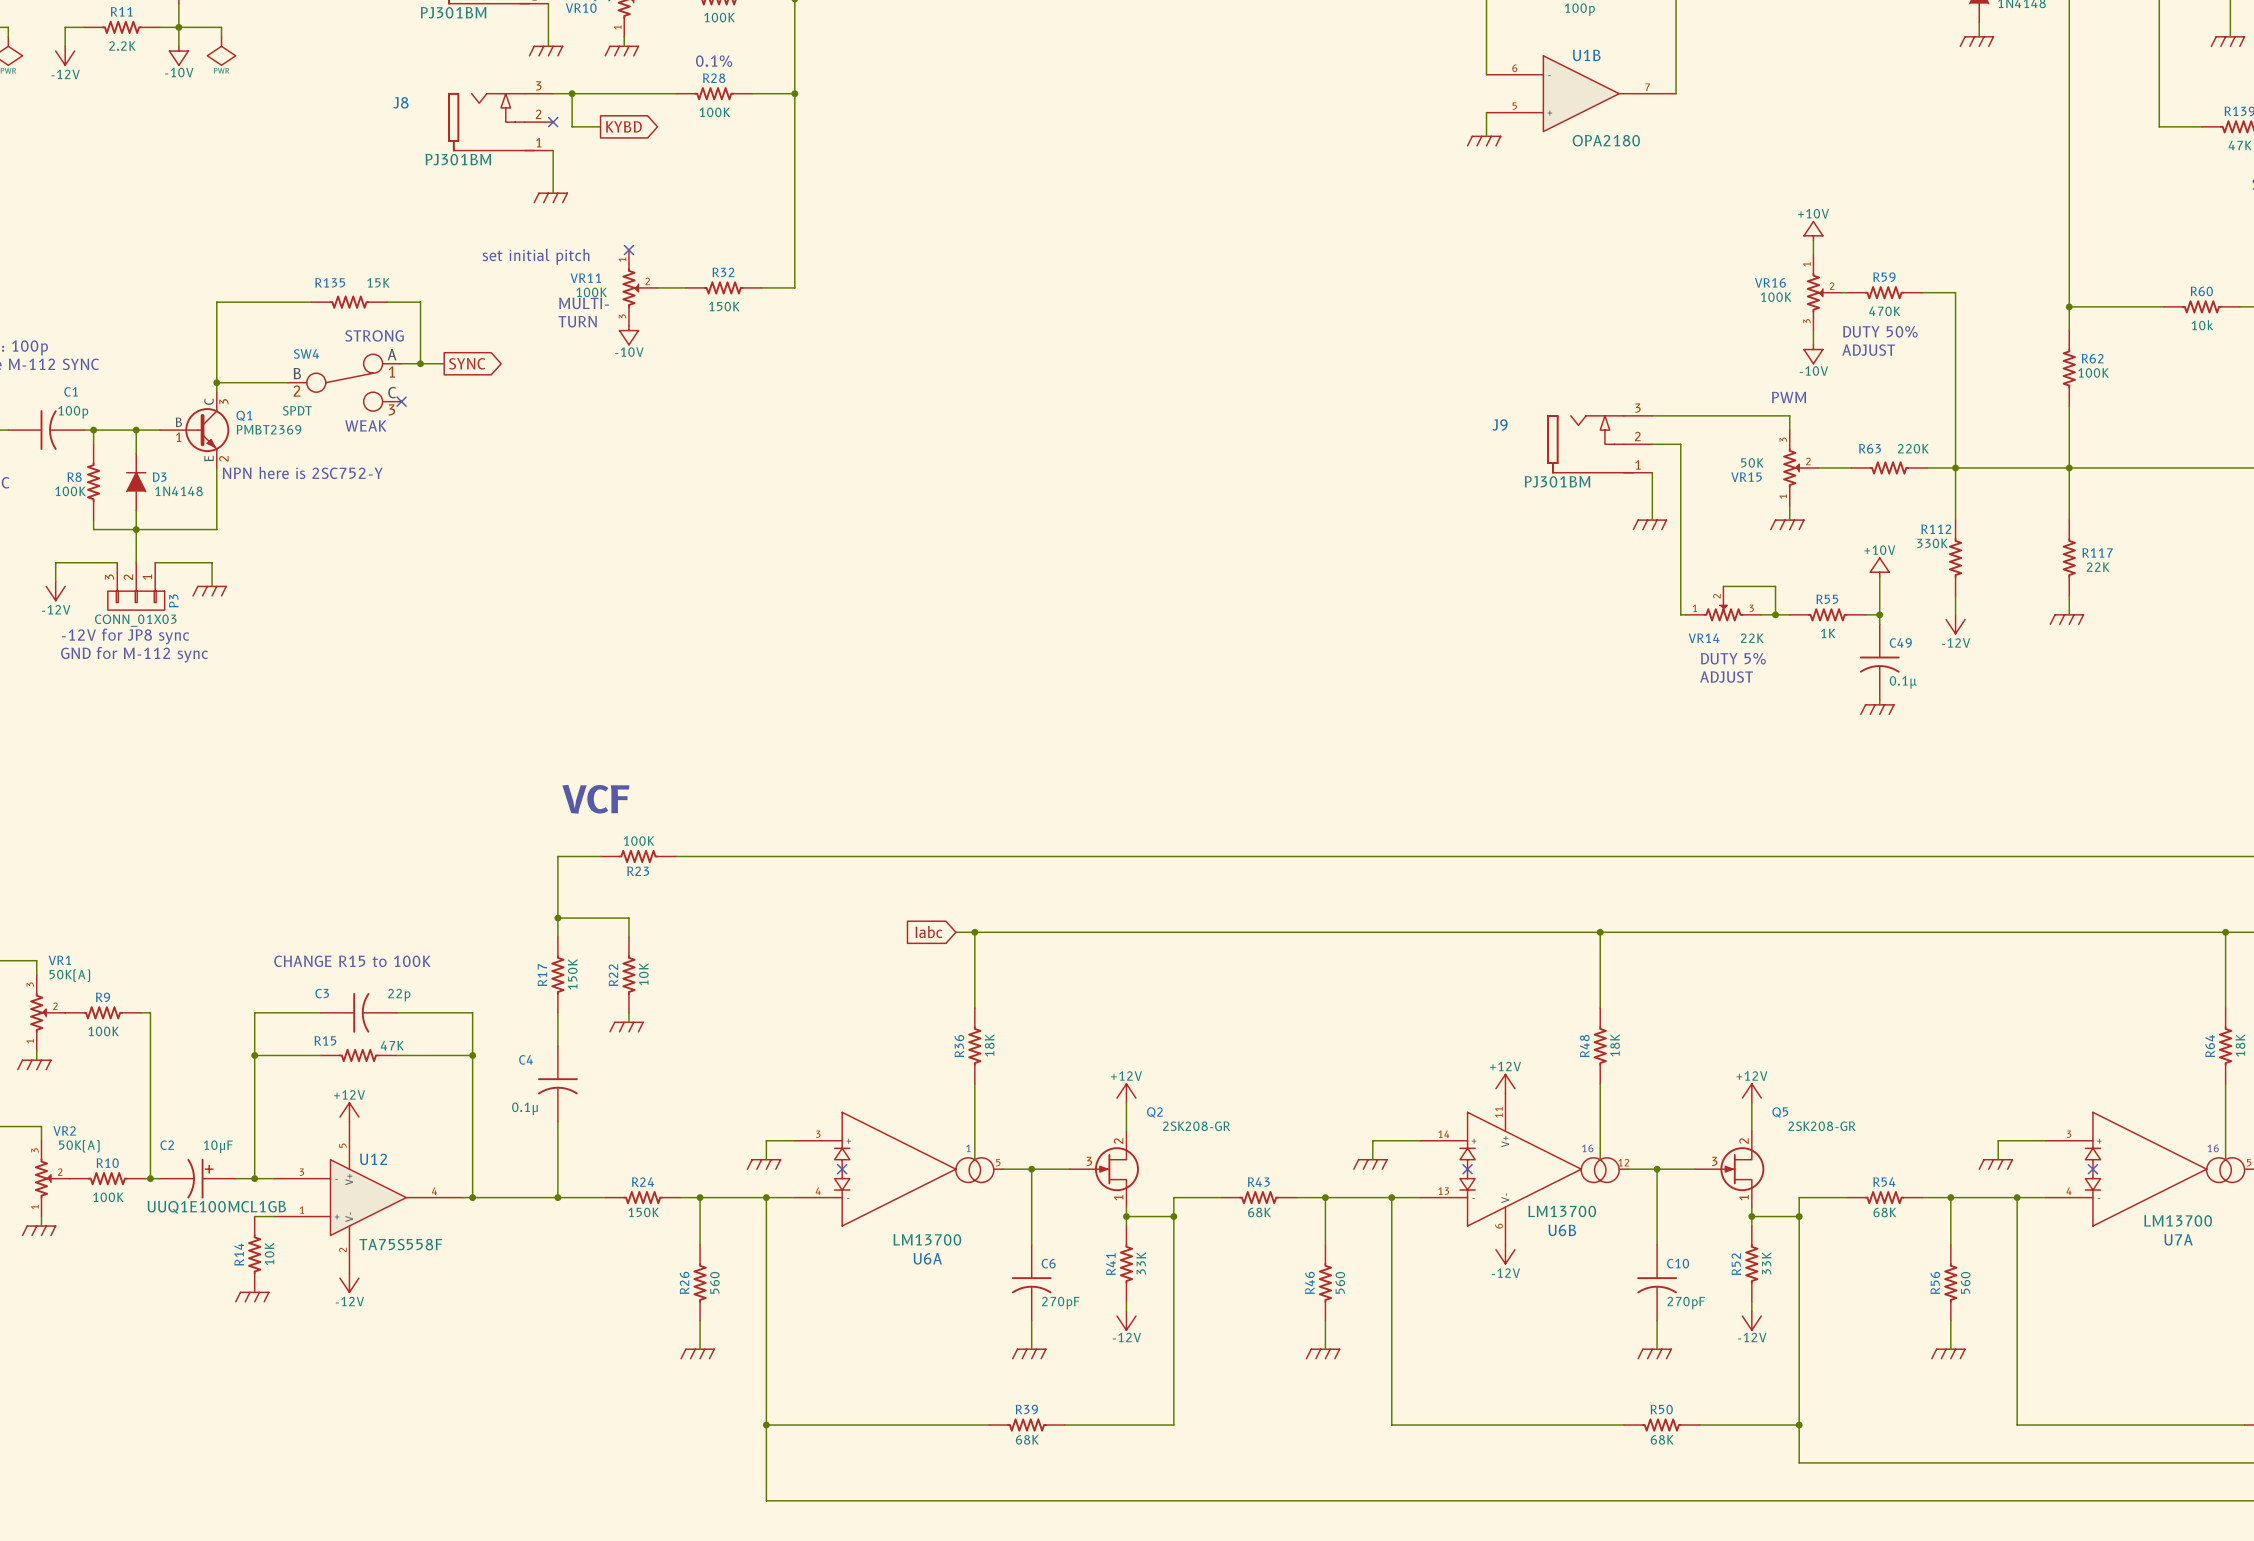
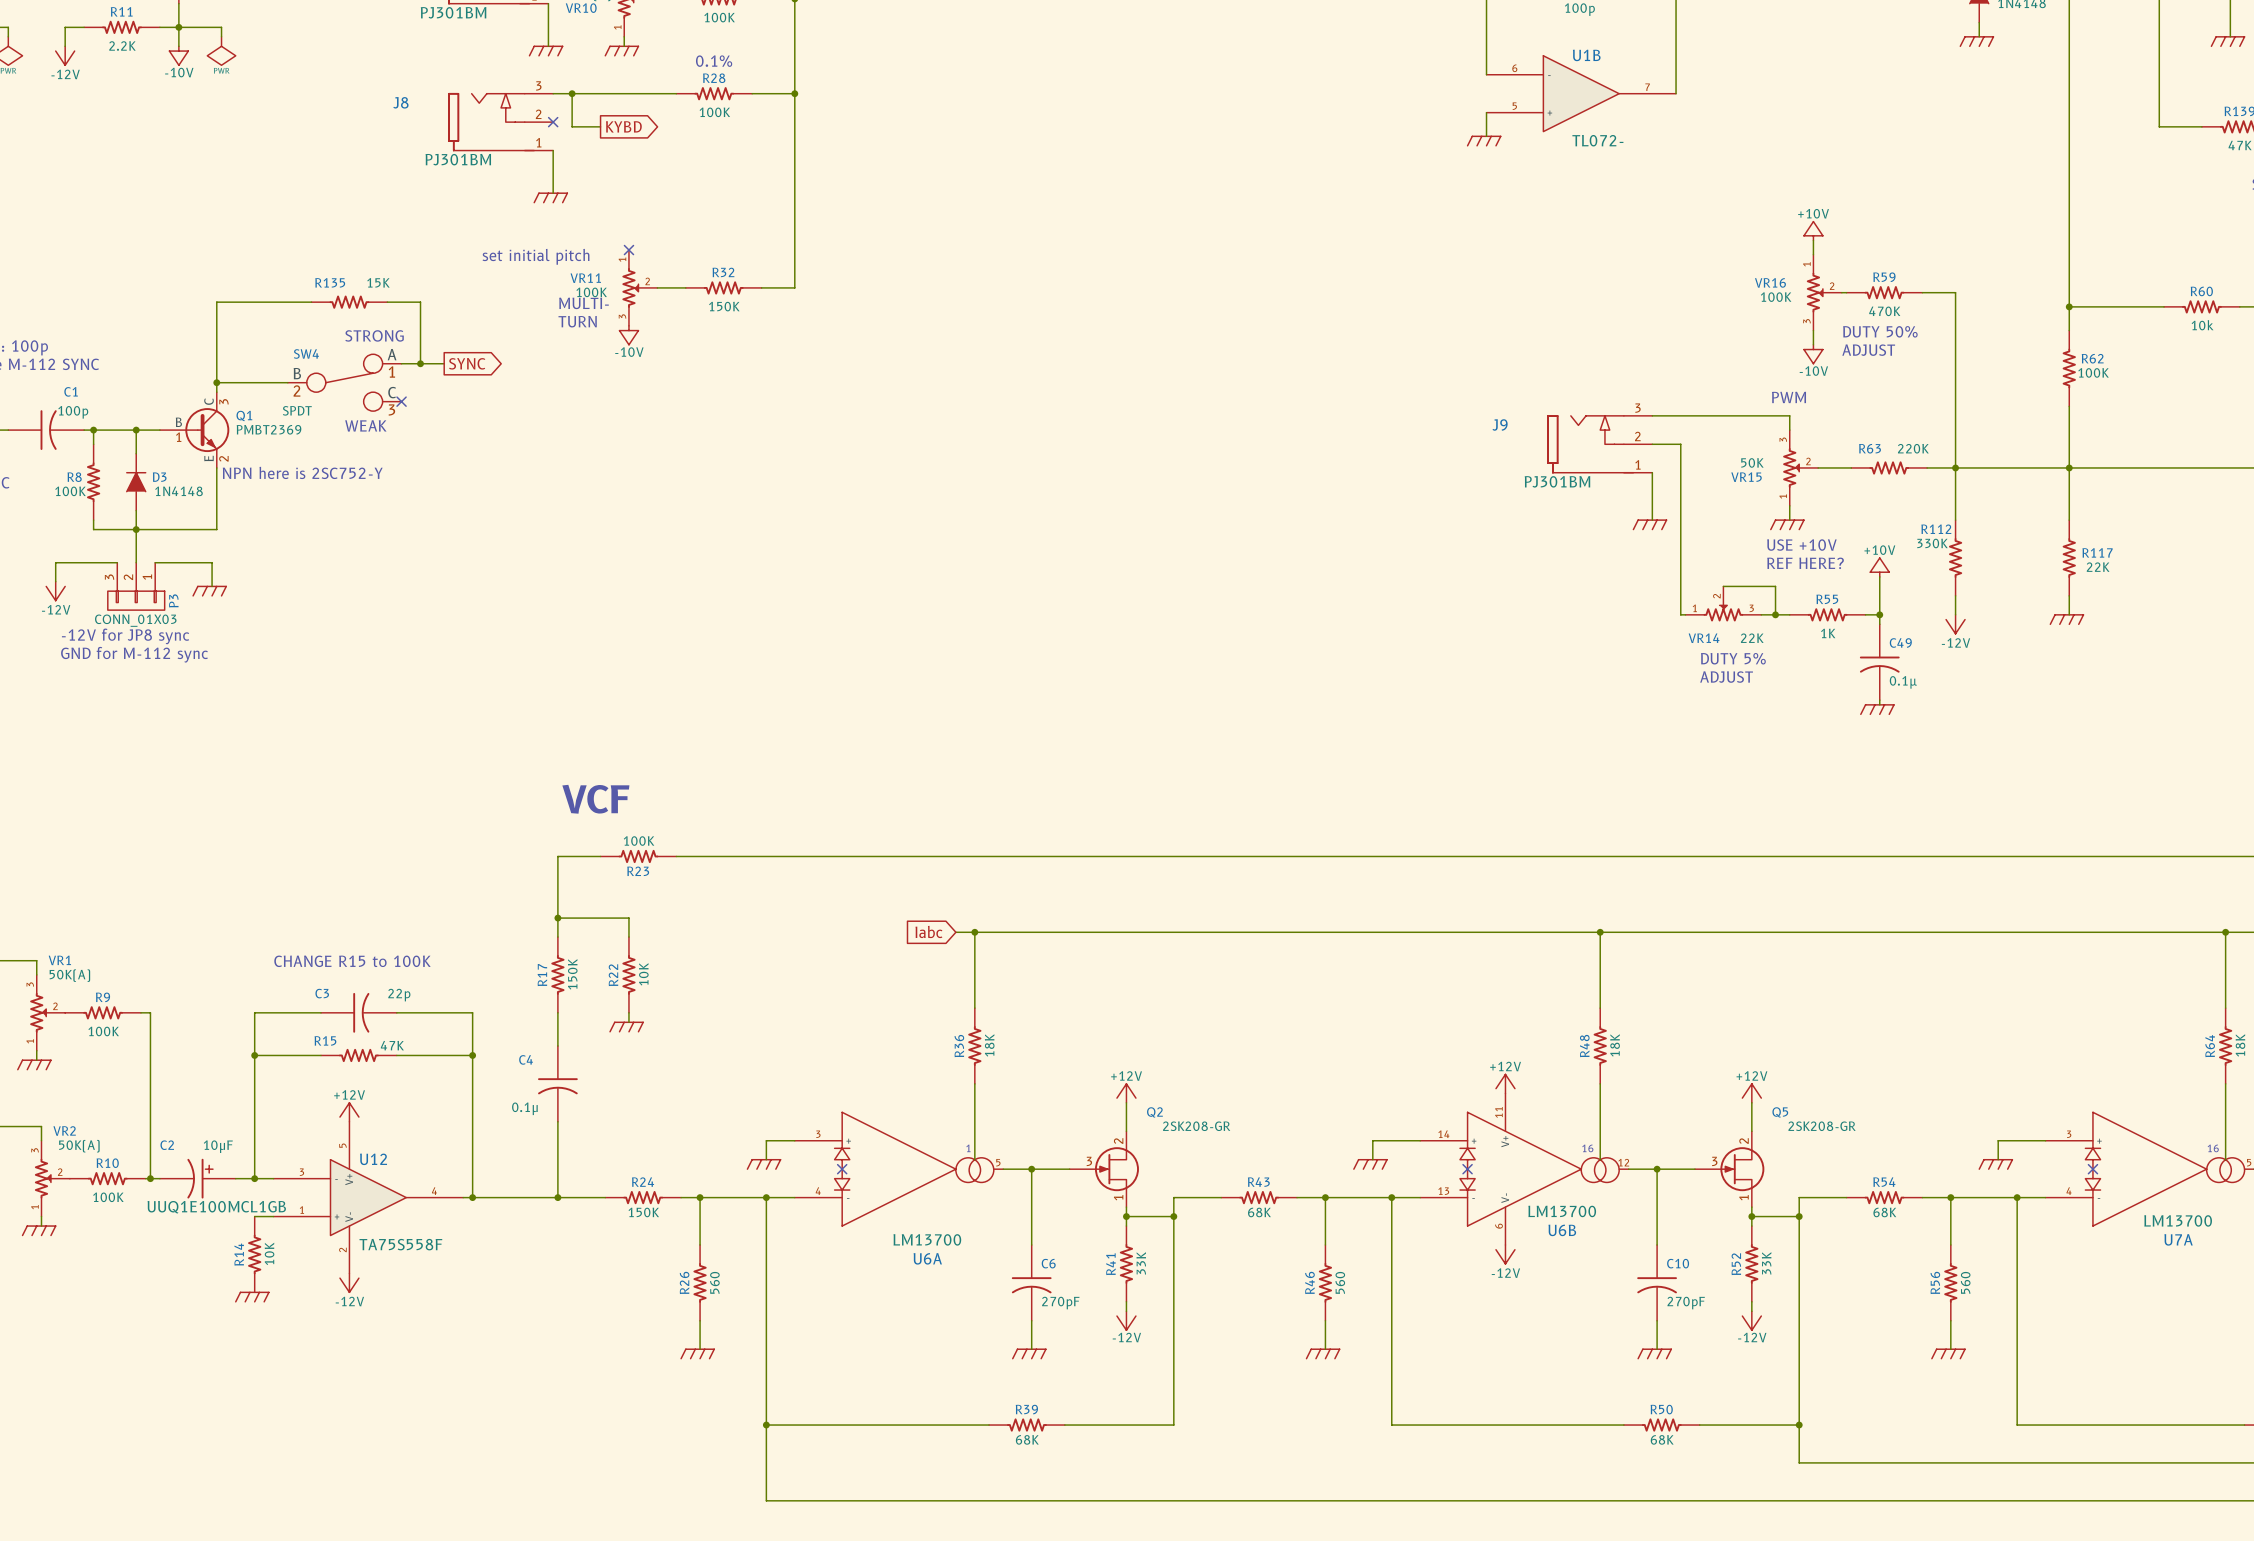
U1B value: OPA2180 (1606, 140) -> TL072- (1597, 140)
text: none -> USE +10V (1801, 545)
text: none -> REF HERE? (1805, 563)

